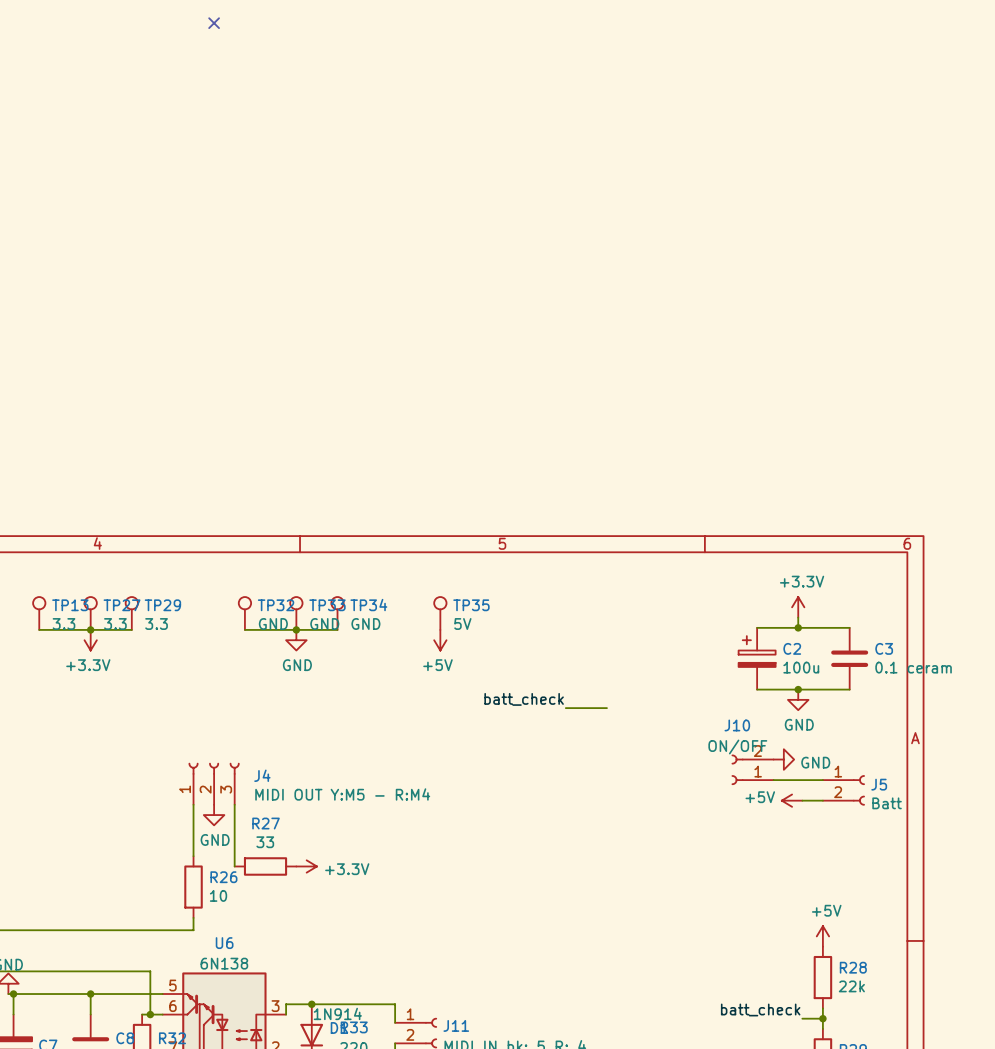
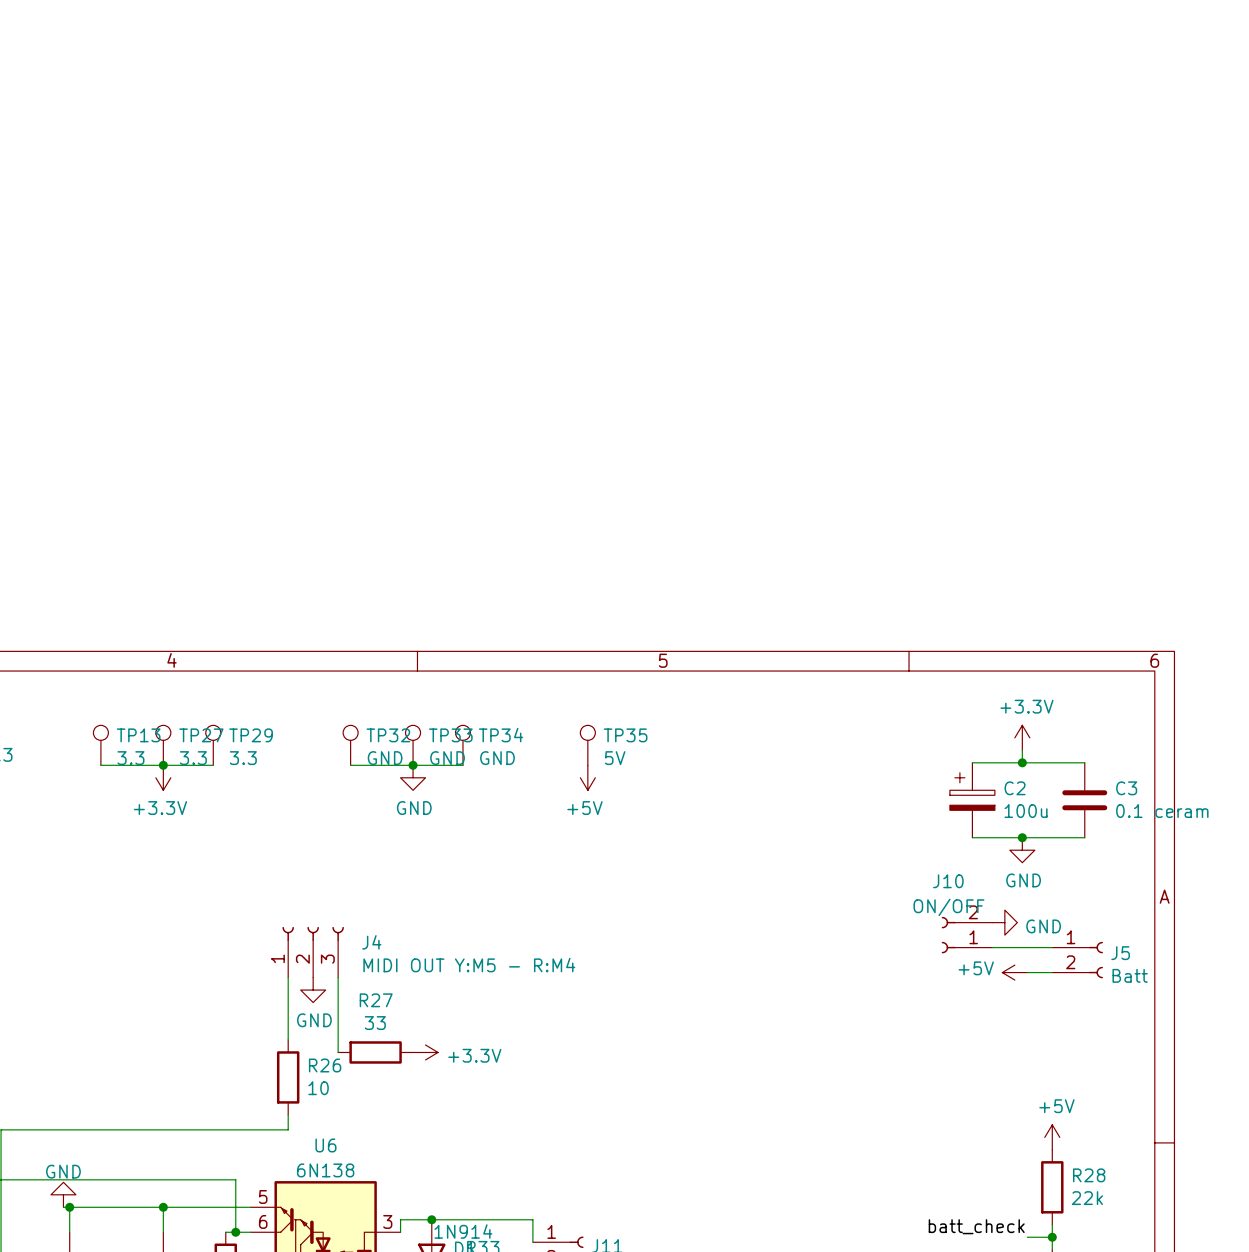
no-connect mark: (214, 23) -> none
label: batt_check (524, 699) -> none
wire: (565, 708) (606, 708) -> none

